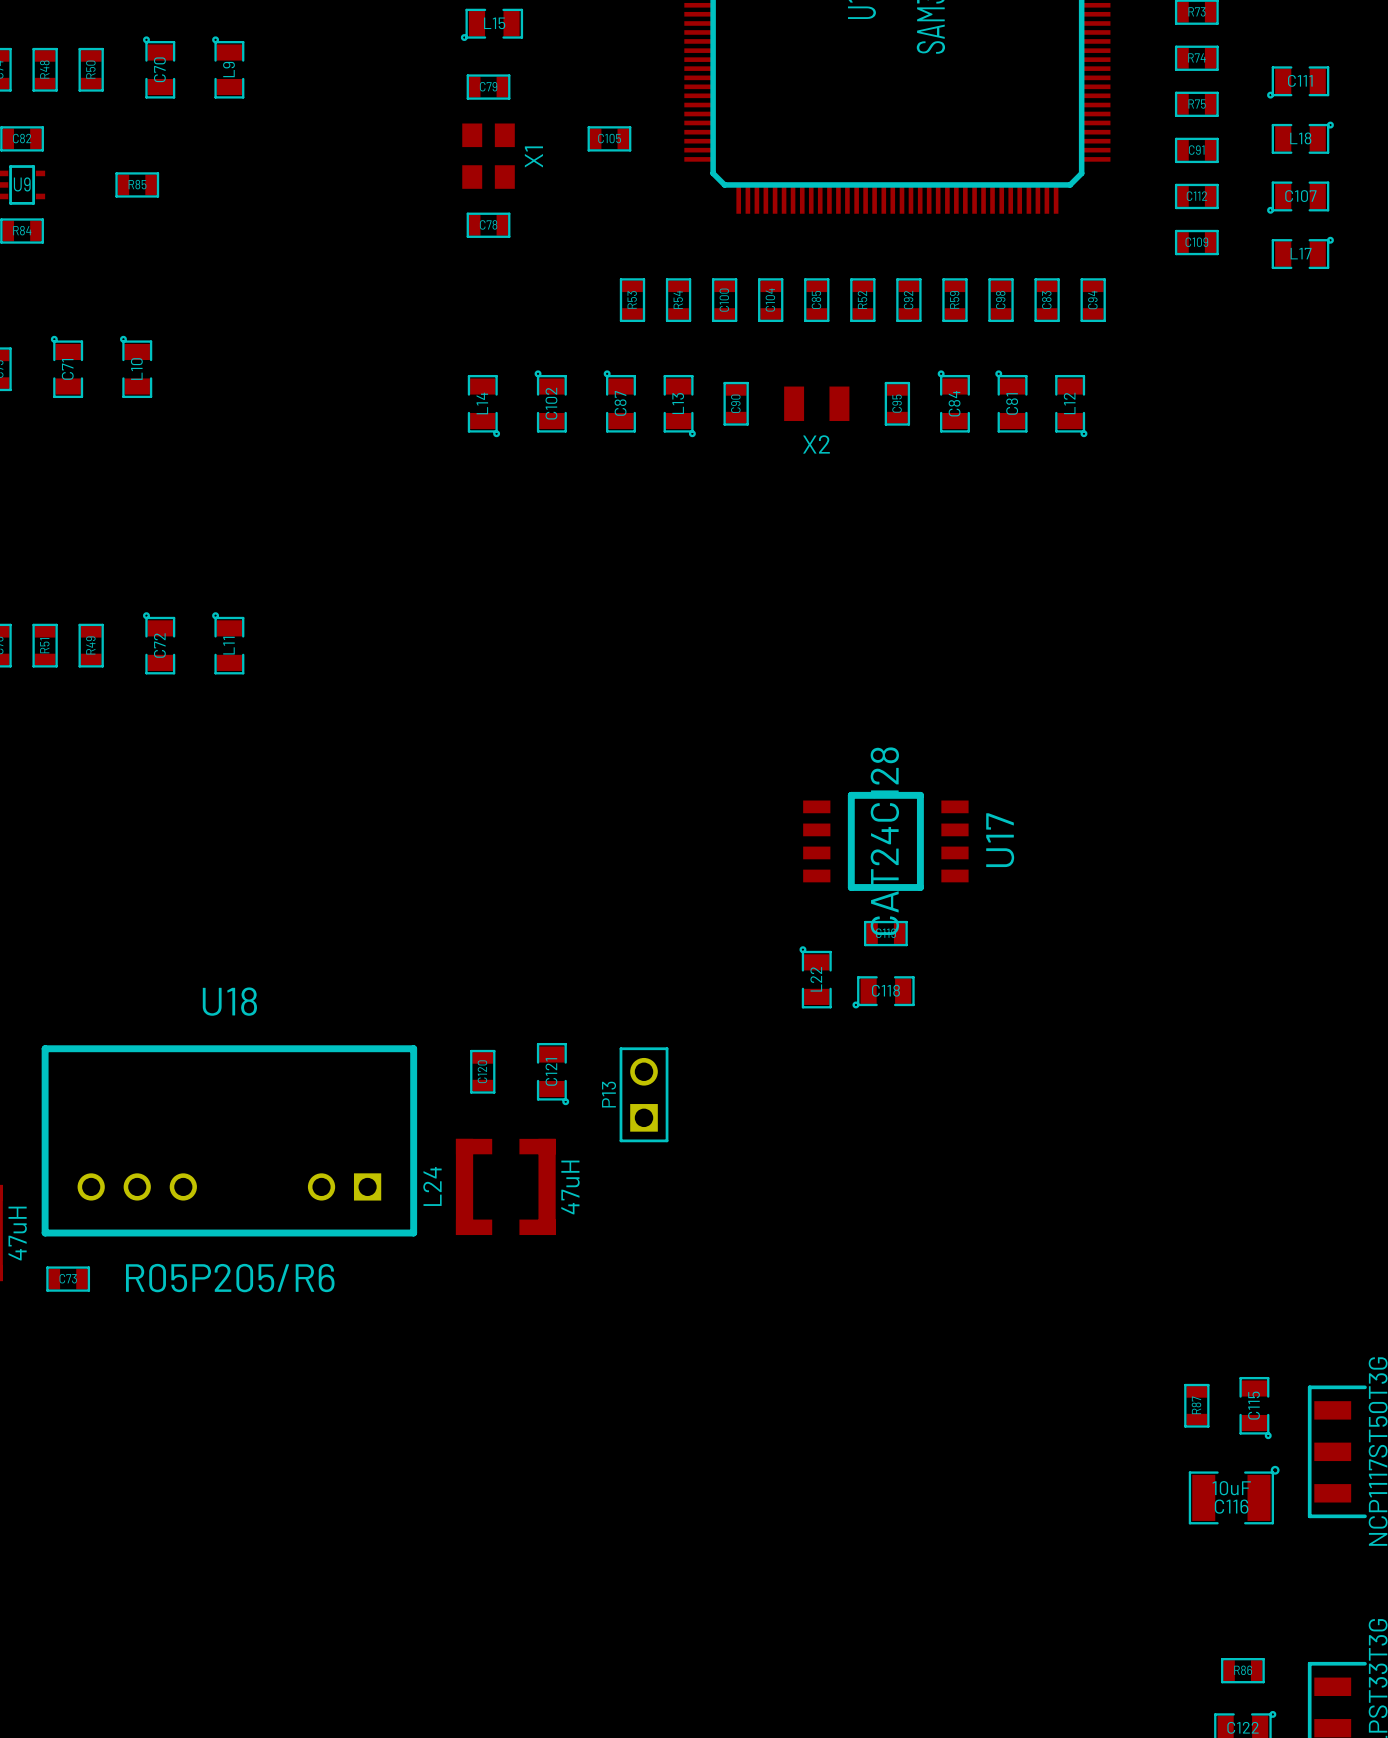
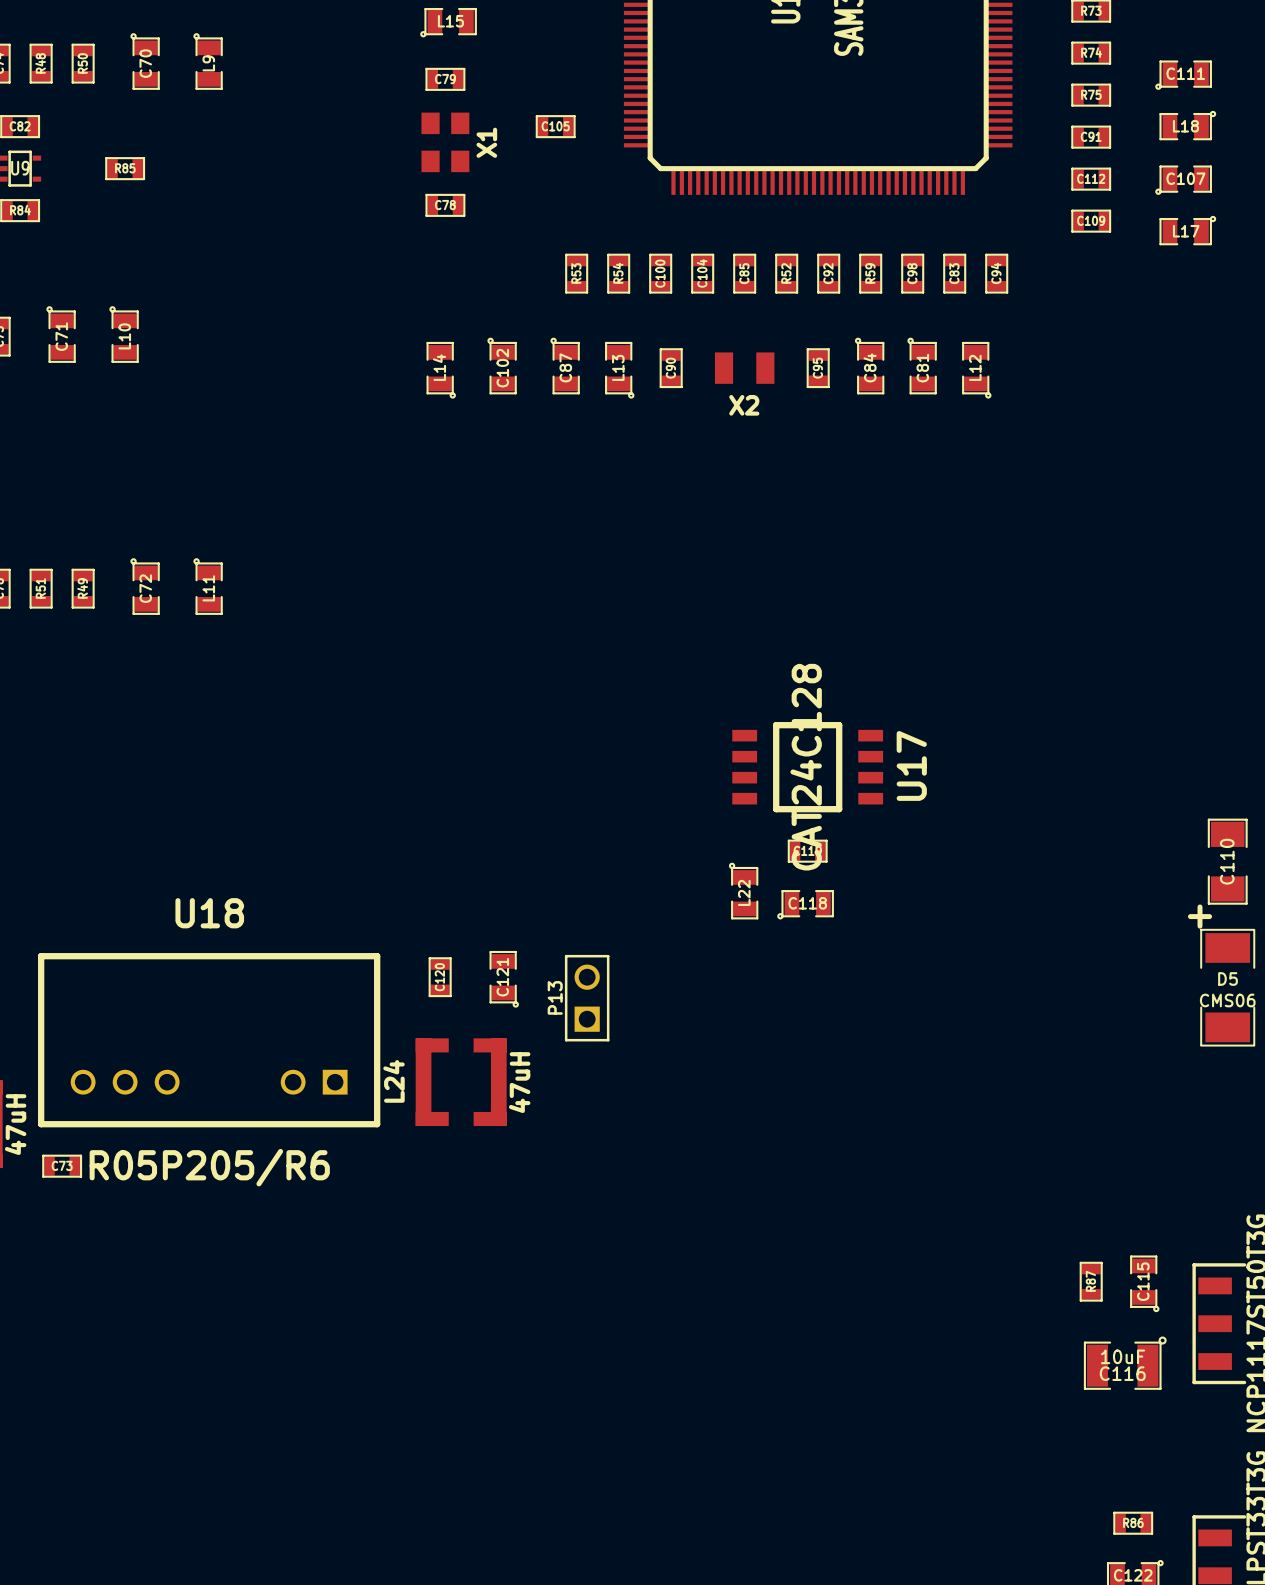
C110: none -> (1227, 861)
D5: none -> CMS06 (1227, 987)

